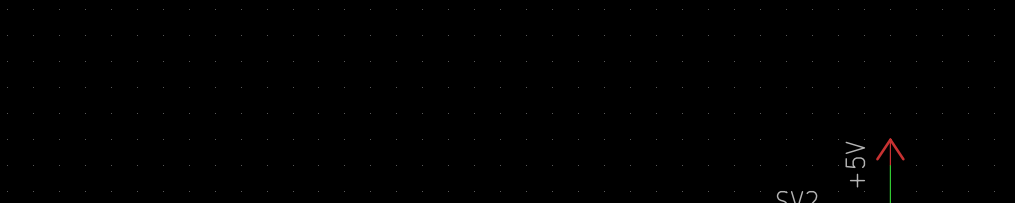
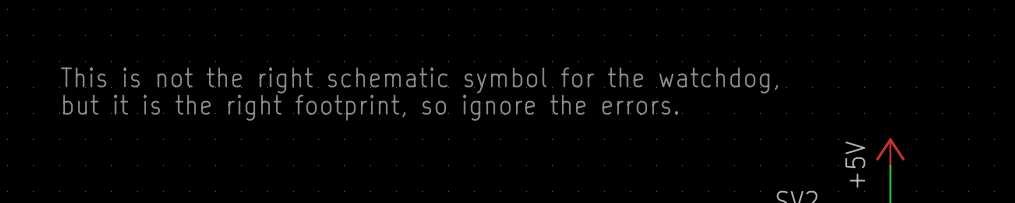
text: none -> This is not the right schematic symbol for the watchdog, (419, 80)
text: none -> but it is the right footprint, so ignore the errors. (370, 107)

